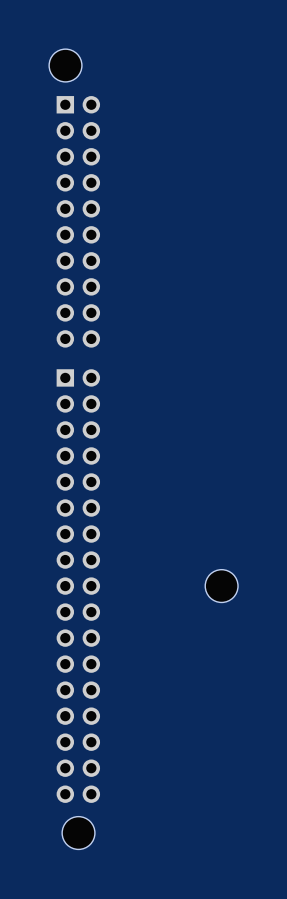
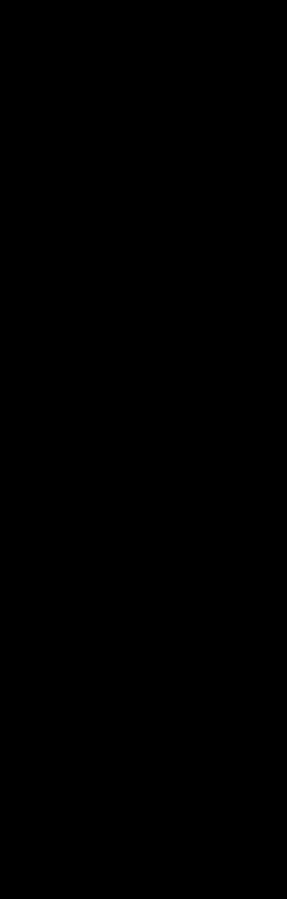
part: (65, 65) -> none
part: (78, 221) -> none
part: (78, 586) -> none
part: (221, 586) -> none
part: (78, 833) -> none

